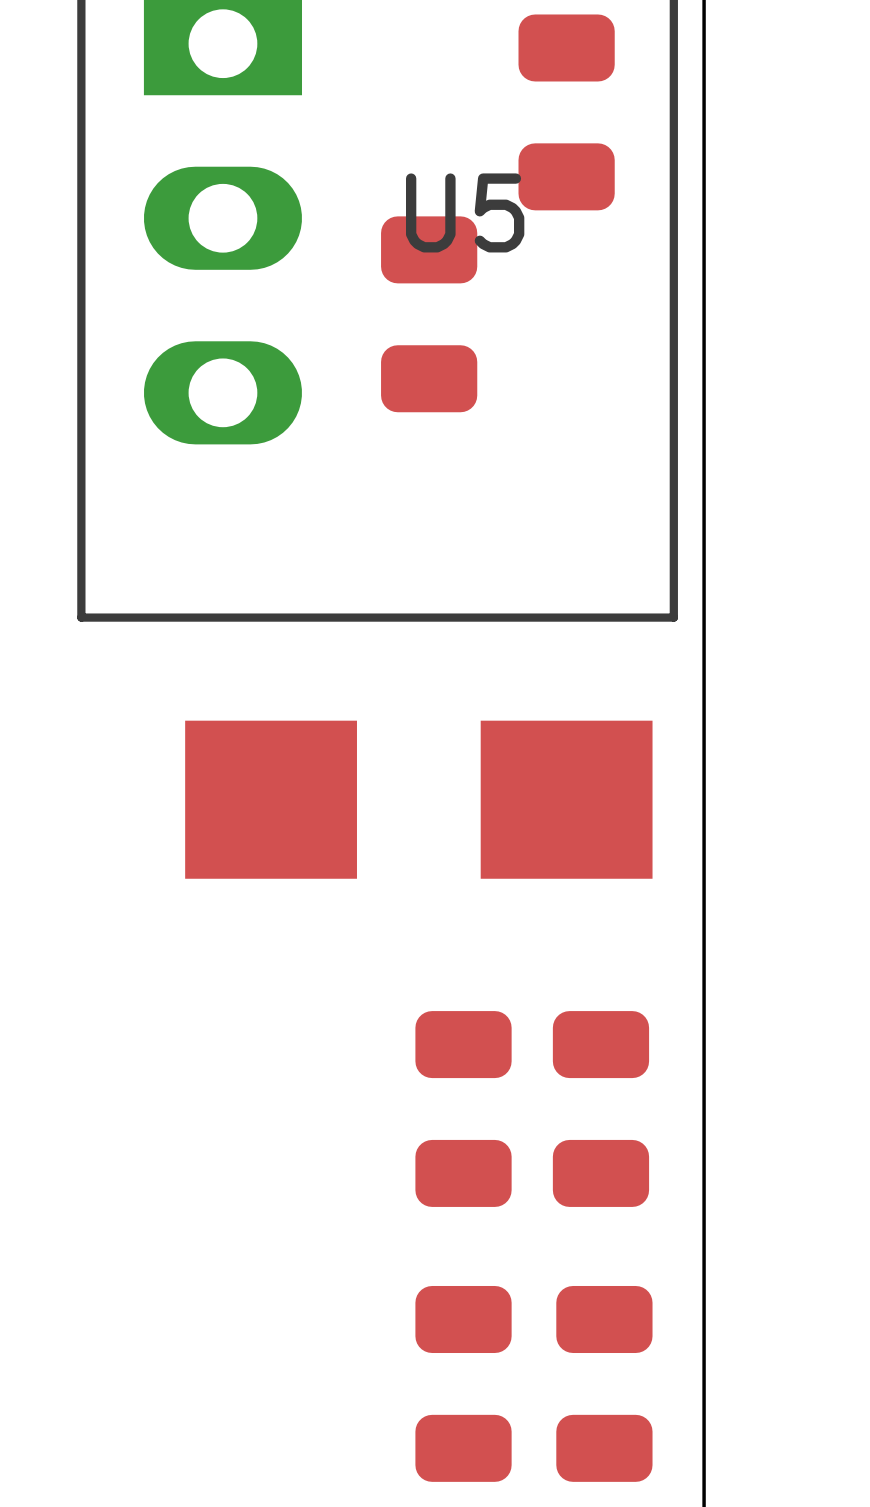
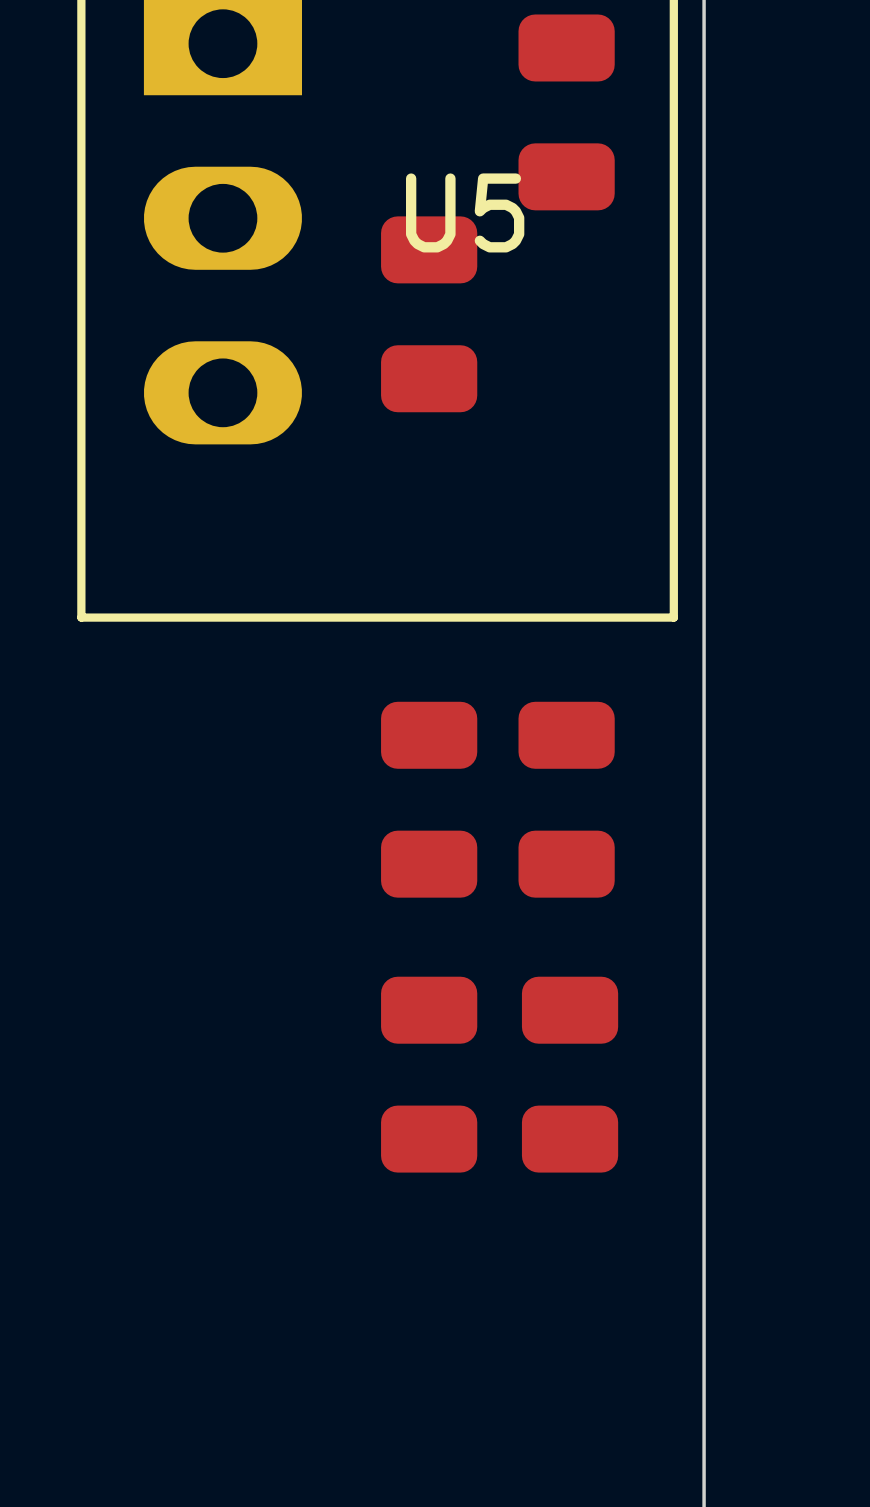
part footprint: [185, 720, 653, 879] -> [381, 701, 478, 898]
part: none -> (566, 799)
part position: (463, 1109) -> (429, 1074)
part position: (600, 1109) -> (570, 1074)
part: (463, 1383) -> none
part: (604, 1383) -> none

